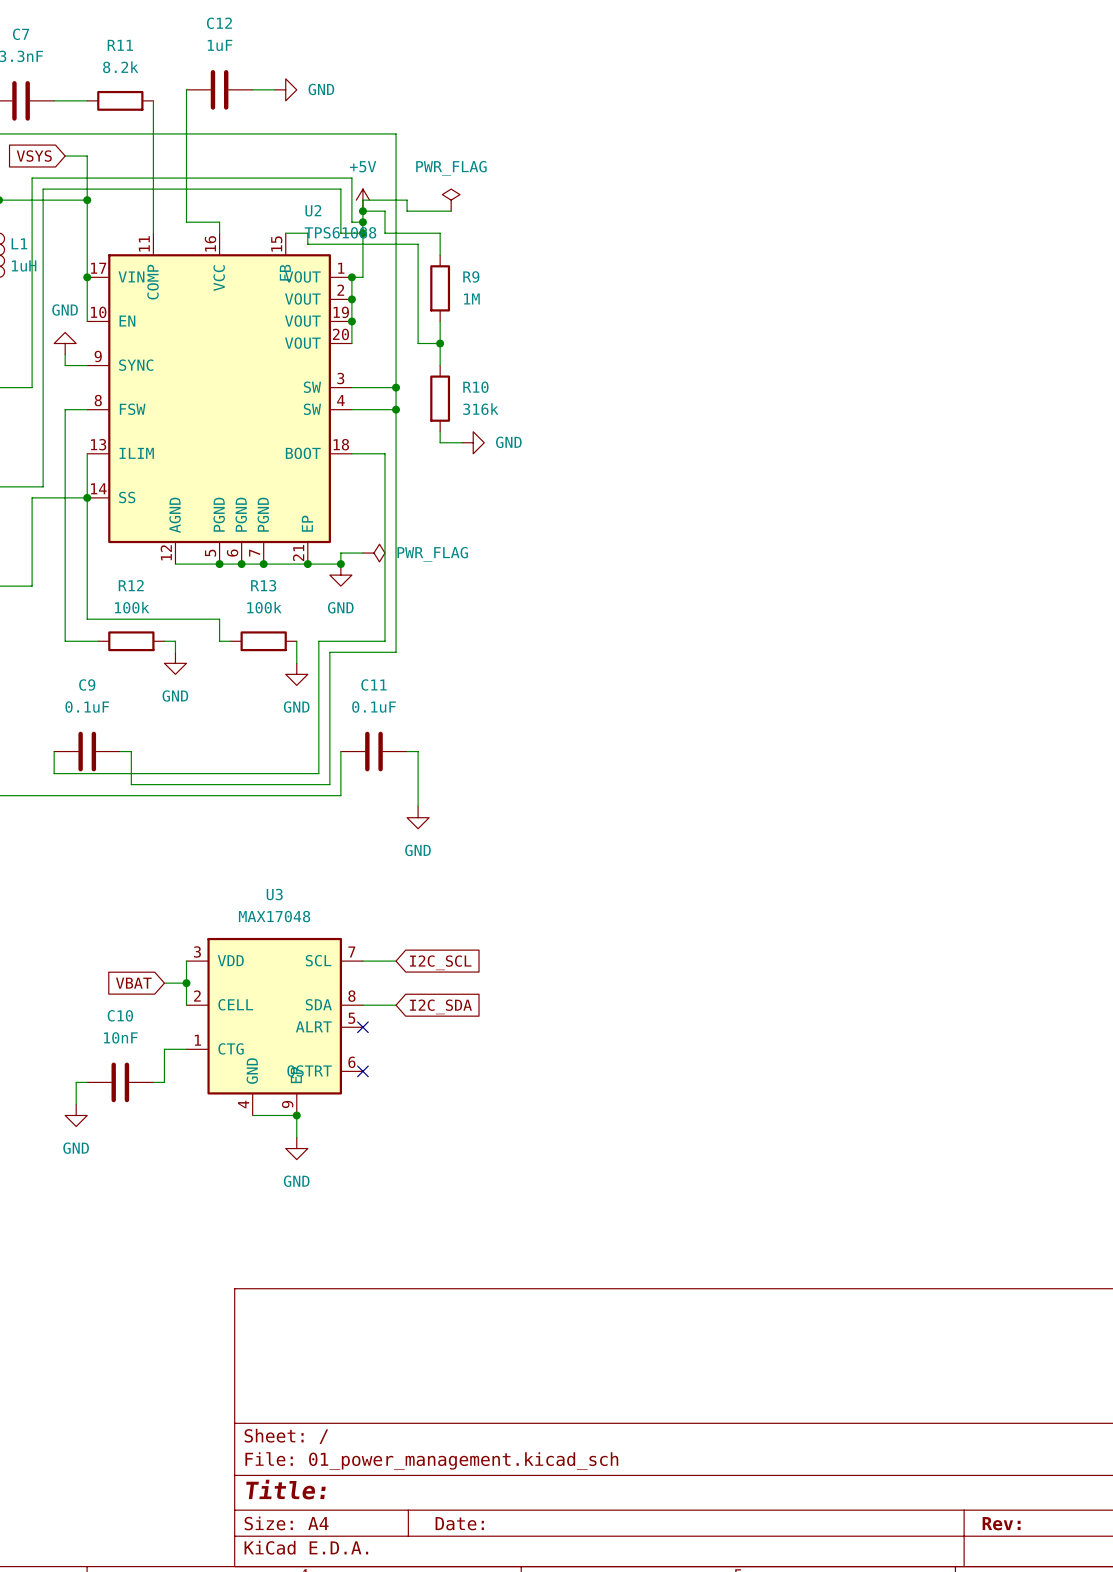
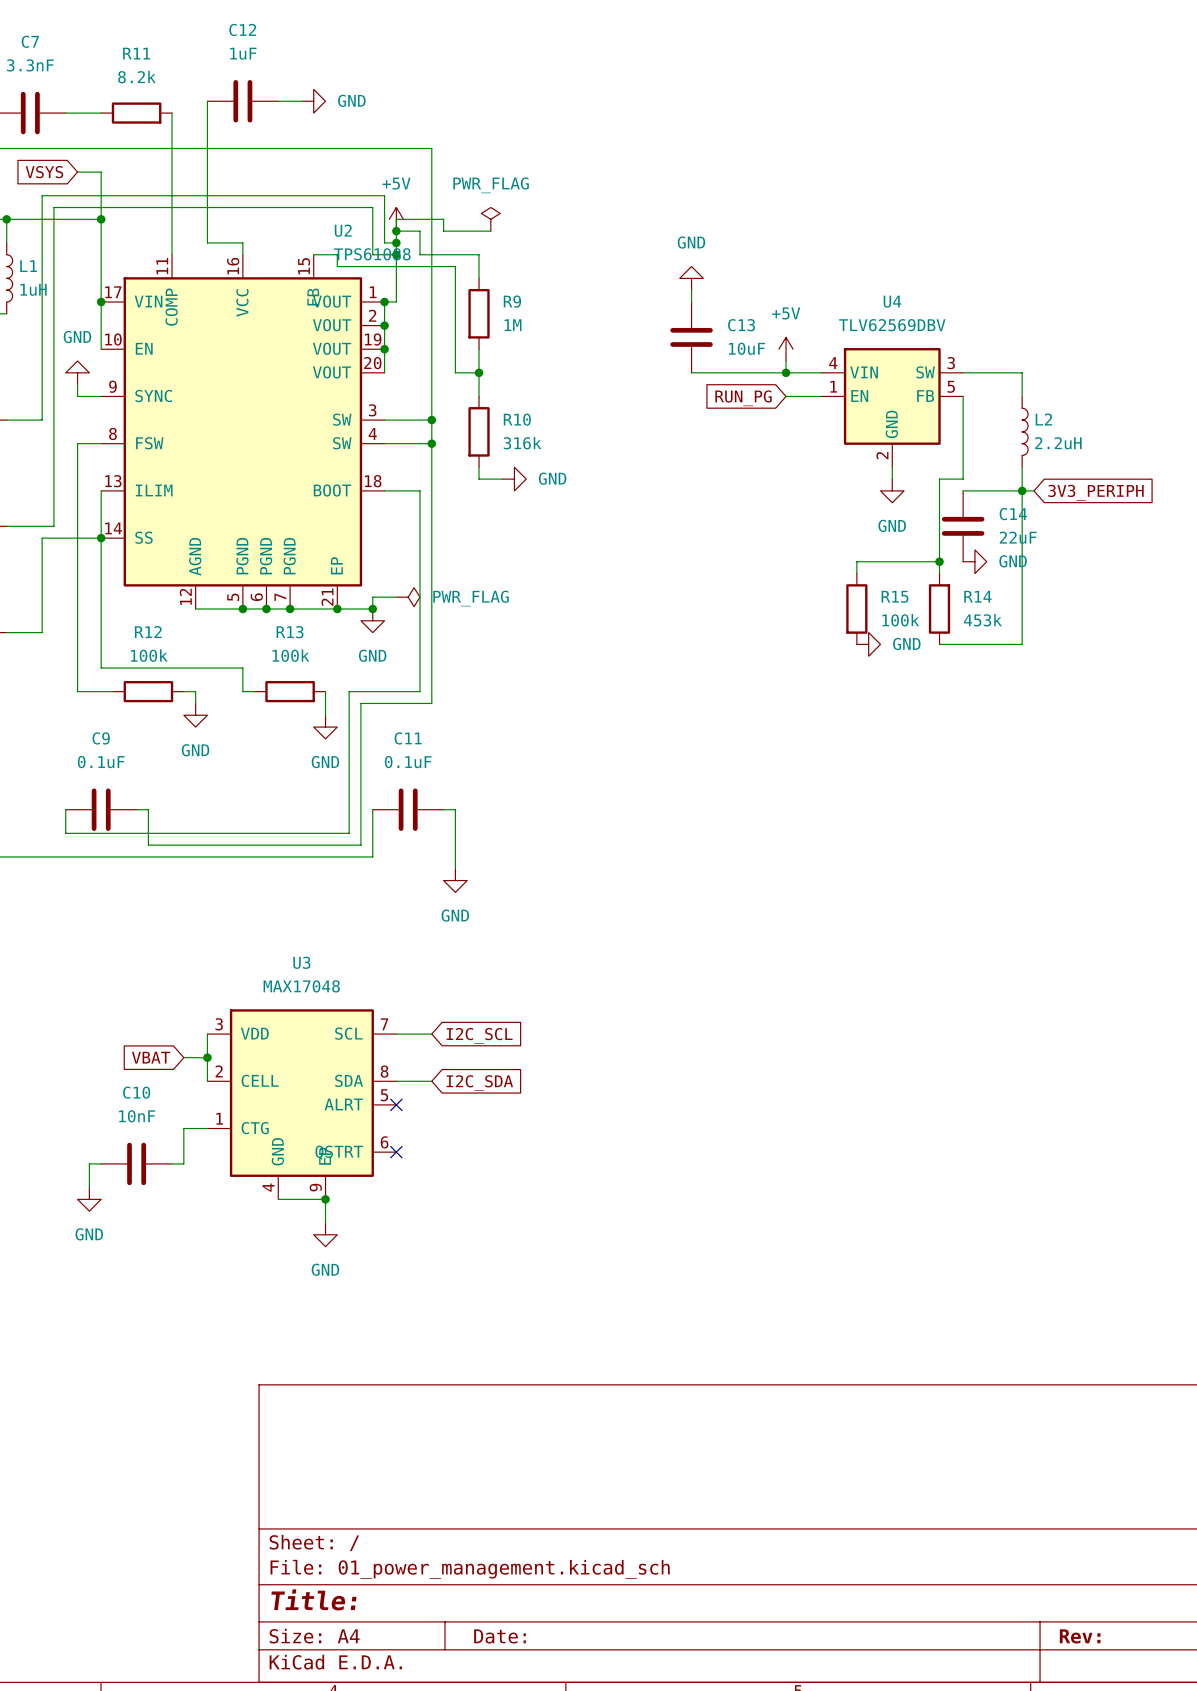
power symbol: none -> GND (691, 278)
wire: none -> (691, 290) (691, 301)
C13: none -> 10uF (691, 337)
power symbol: none -> +5V (786, 349)
wire: none -> (786, 361) (786, 372)
wire: none -> (691, 372) (821, 372)
junction: none -> (786, 372)
wire: none -> (963, 372) (1022, 372) (1022, 396)
wire: none -> (786, 396) (821, 396)
wire: none -> (963, 396) (963, 479) (939, 479) (939, 573)
global label: none -> RUN_PG (743, 398)
U4: none -> TLV62569DBV (892, 407)
L2: none -> 2.2uH (1025, 431)
wire: none -> (892, 467) (892, 479)
wire: none -> (1022, 467) (1022, 644) (939, 644)
power symbol: none -> GND (892, 490)
wire: none -> (963, 490) (1033, 490)
junction: none -> (1022, 490)
global label: none -> 3V3_PERIPH (1096, 492)
C14: none -> 22uF (963, 526)
wire: none -> (939, 561) (856, 561) (856, 573)
junction: none -> (939, 561)
power symbol: none -> GND (974, 561)
R15: none -> 100k (856, 608)
R14: none -> 453k (939, 608)
power symbol: none -> GND (868, 644)

